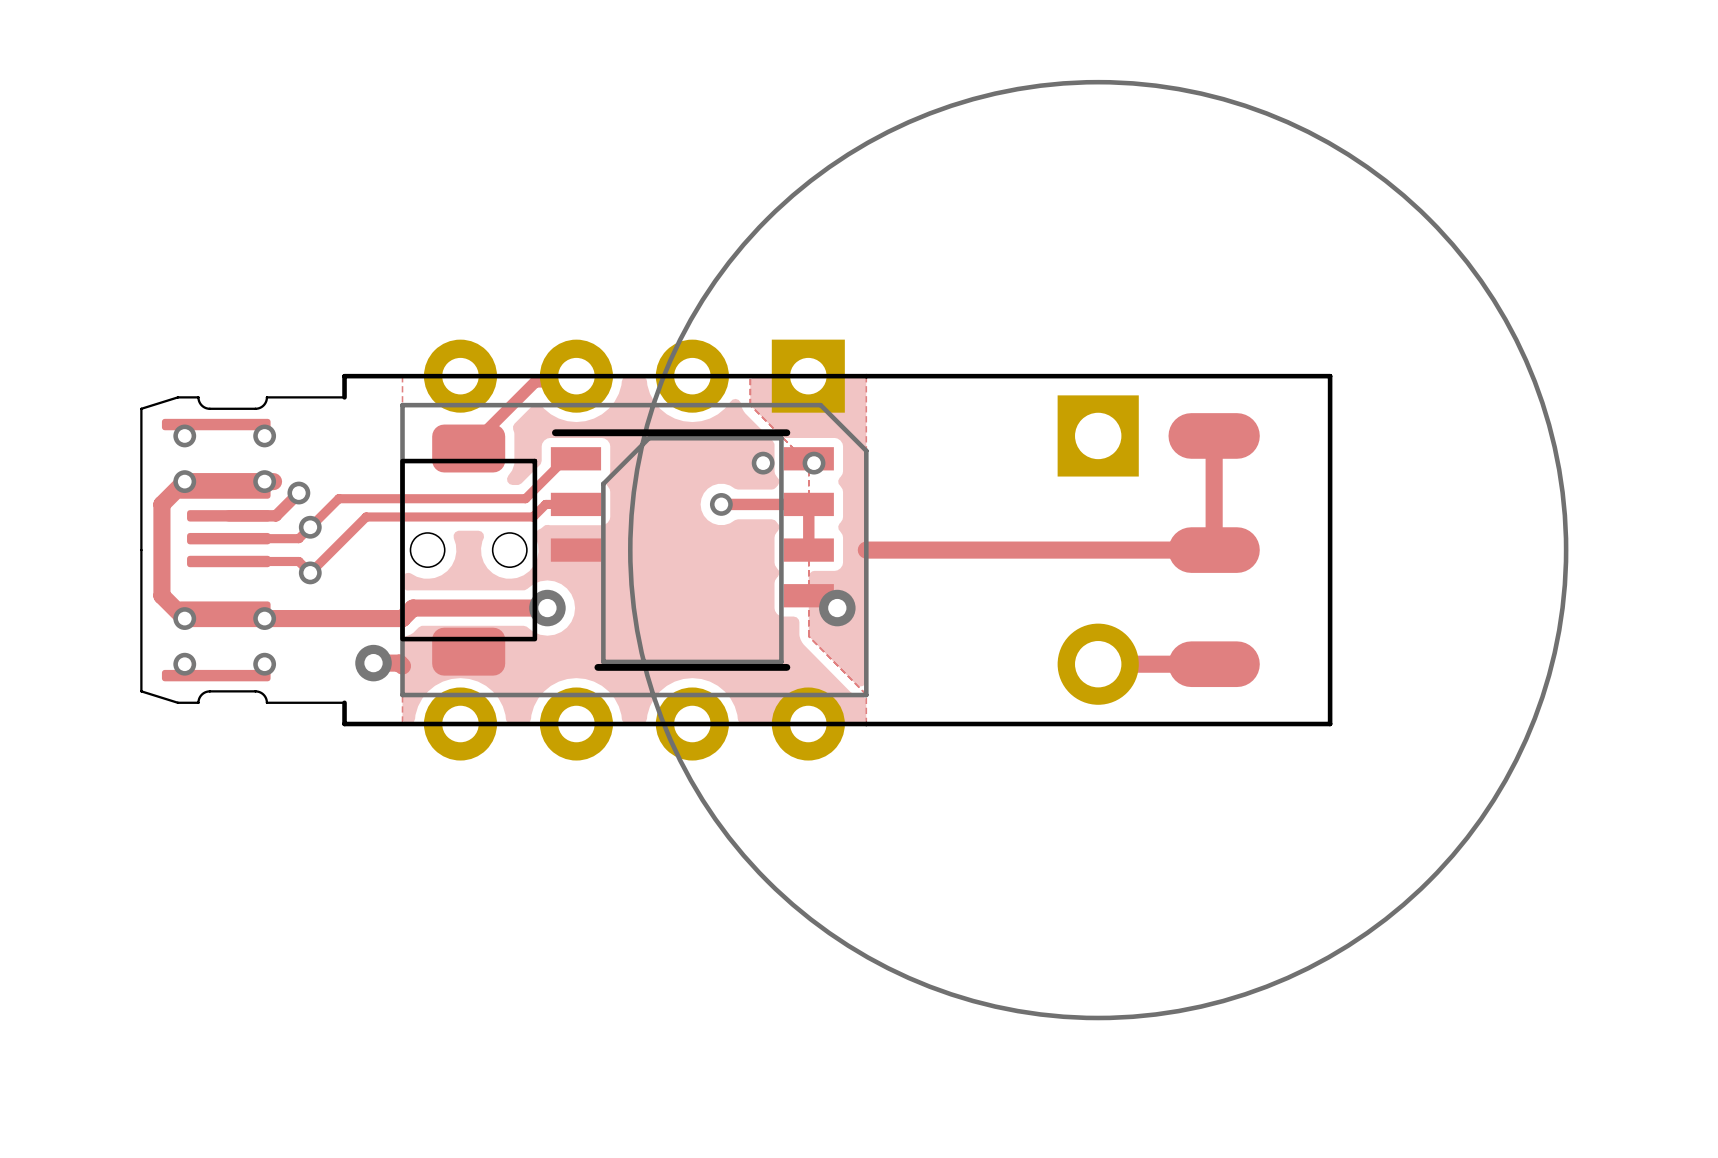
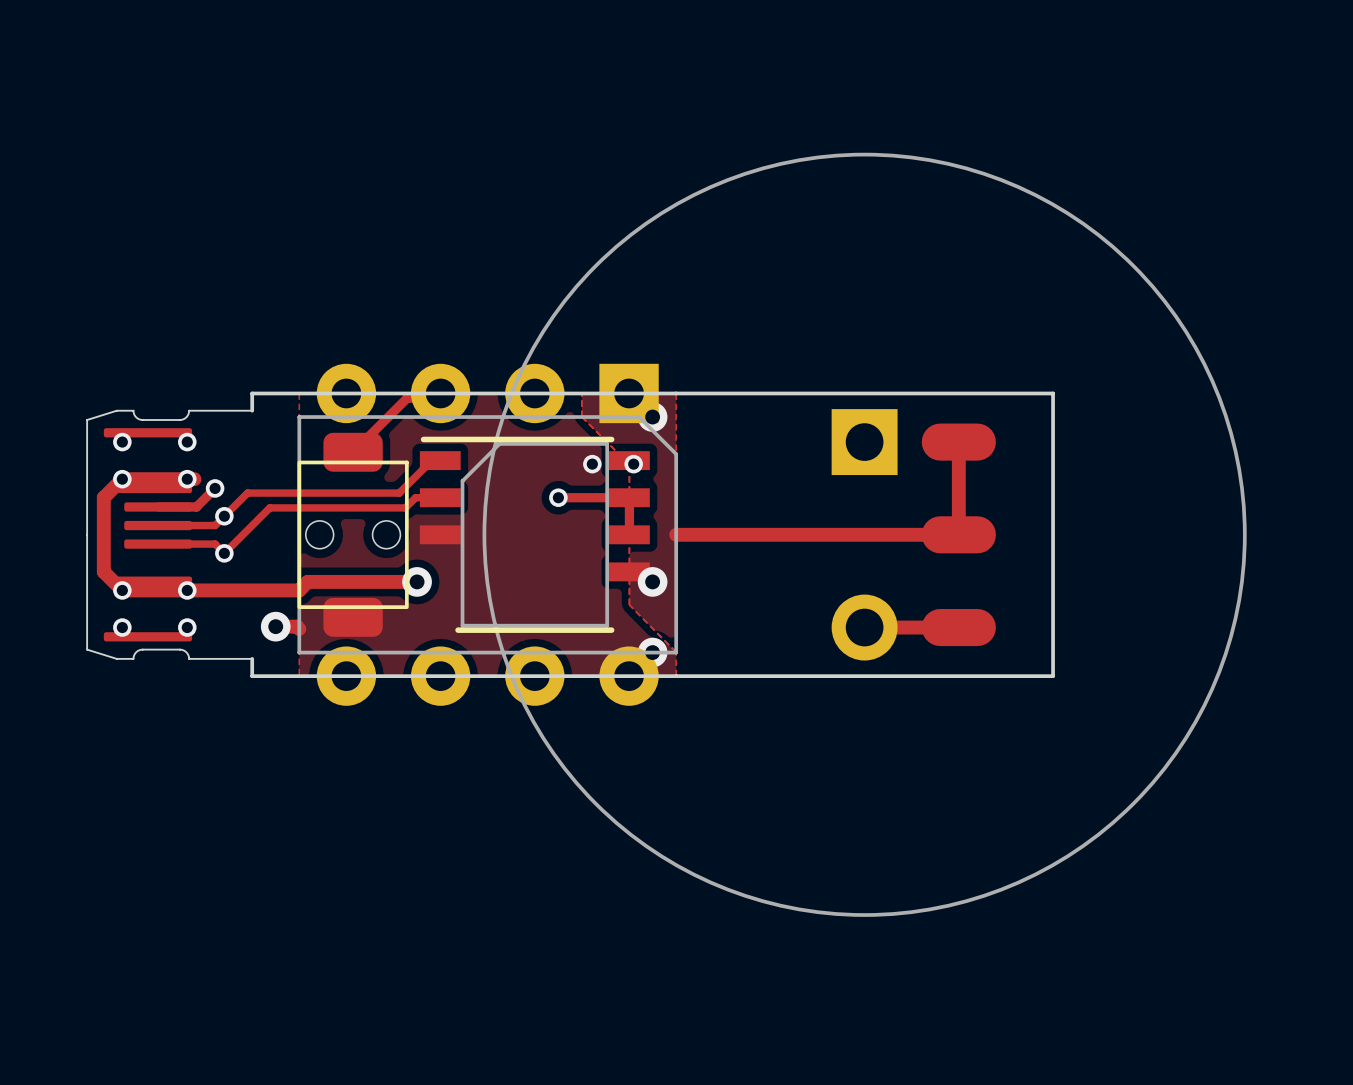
via: none -> (652, 417)
via: none -> (652, 652)

